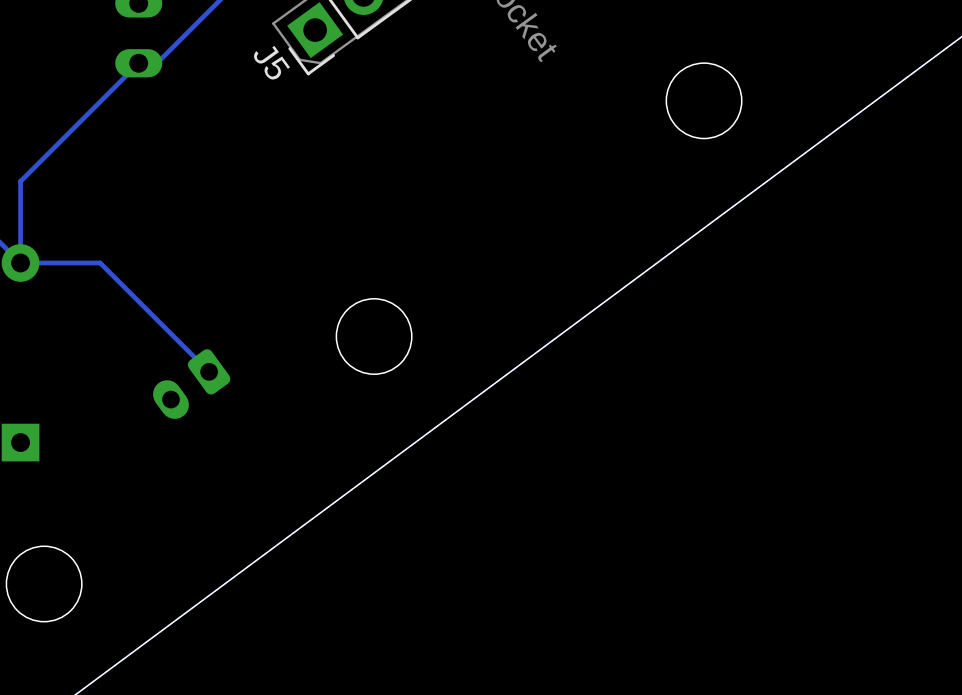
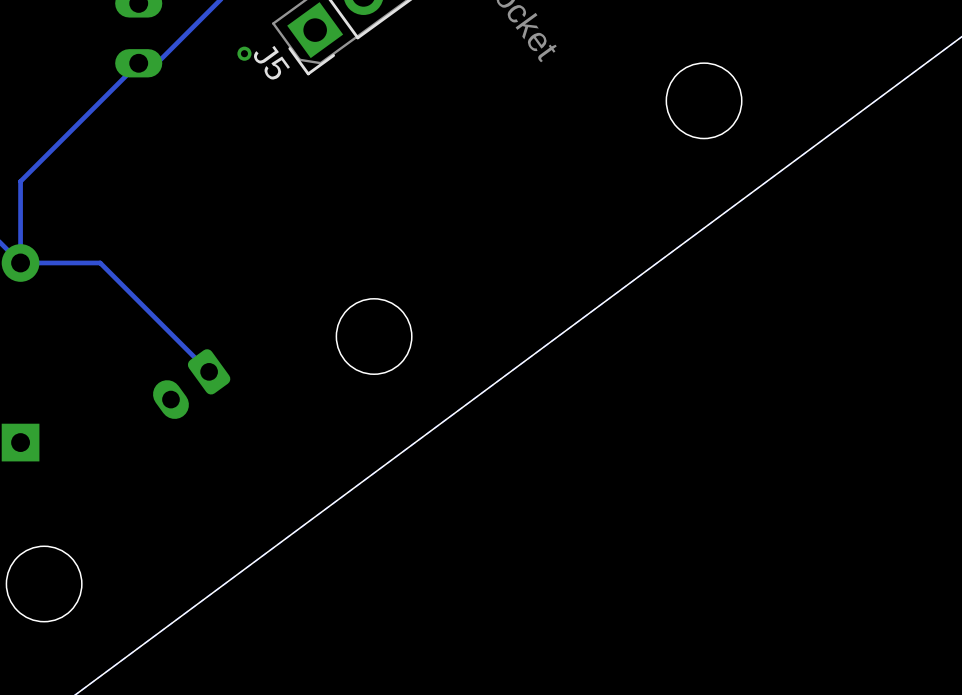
via: none -> (244, 53)

